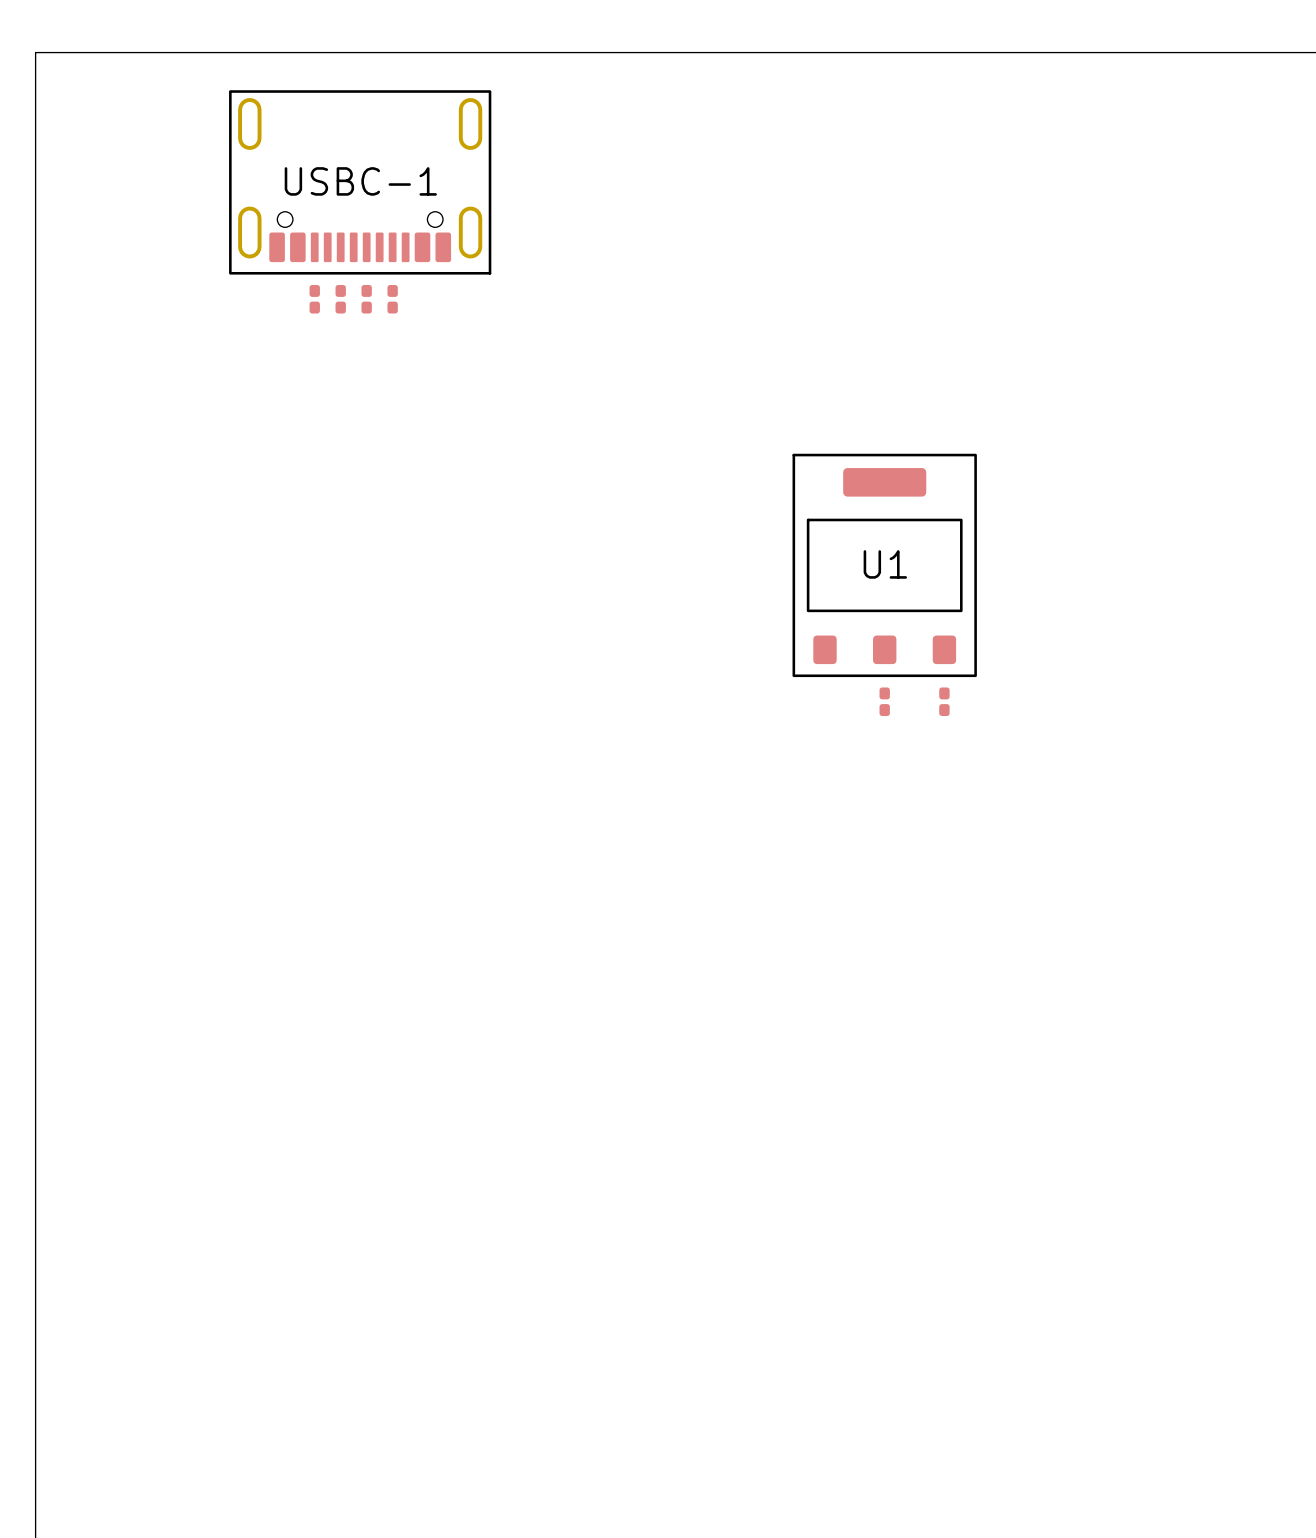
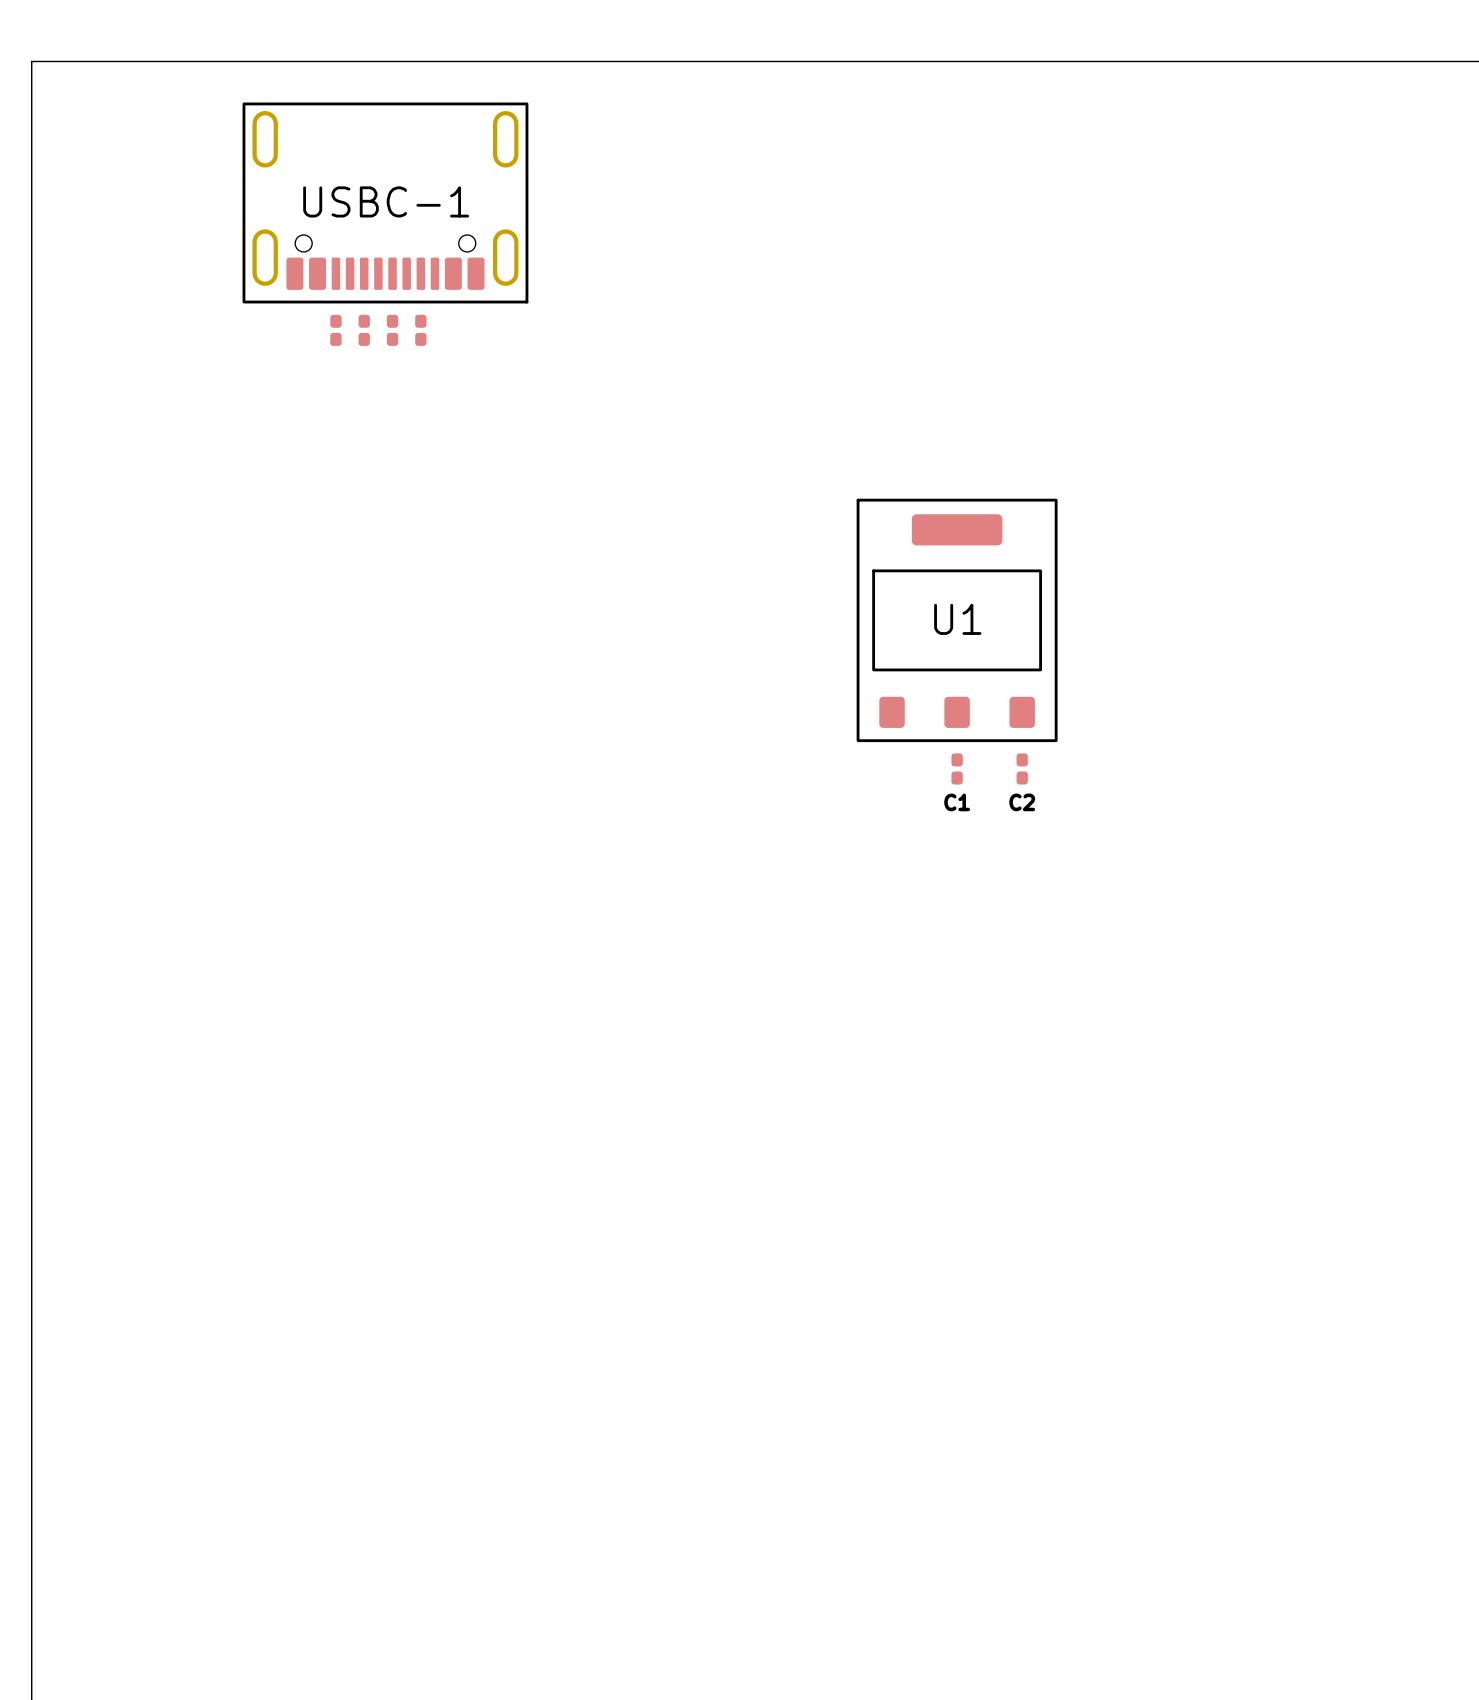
C1 name: none -> C1 (957, 802)
C2 name: none -> C2 (1022, 802)

